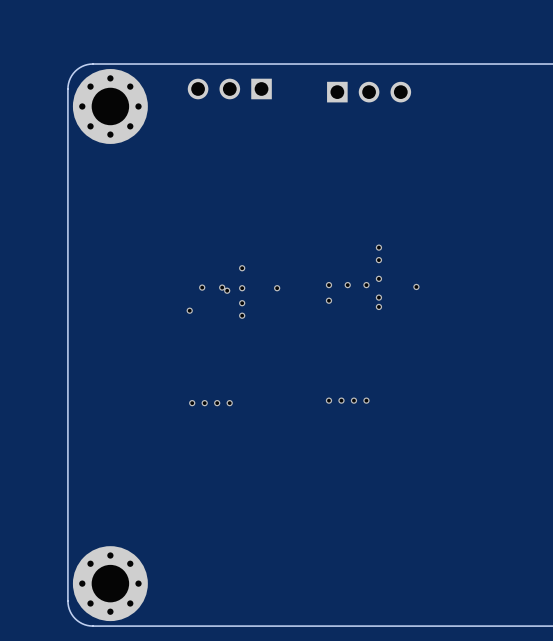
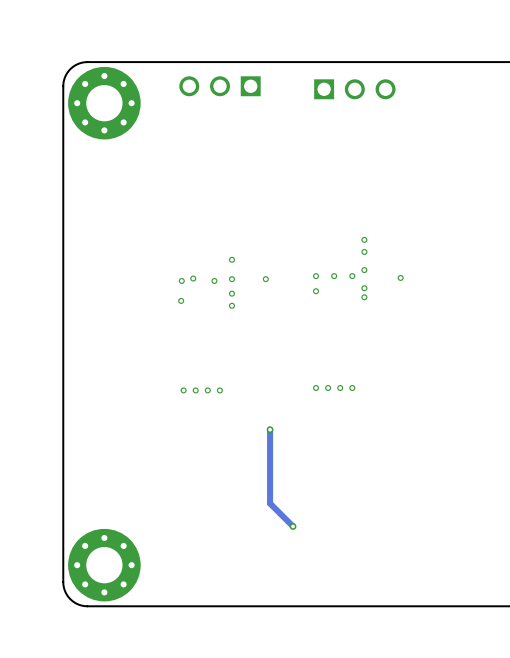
via: (222, 287) -> none
via: none -> (181, 280)
via: none -> (214, 280)
via: (227, 290) -> none
track: none -> (270, 429) (270, 503) (293, 526)
via: none -> (270, 429)
via: none -> (293, 526)

